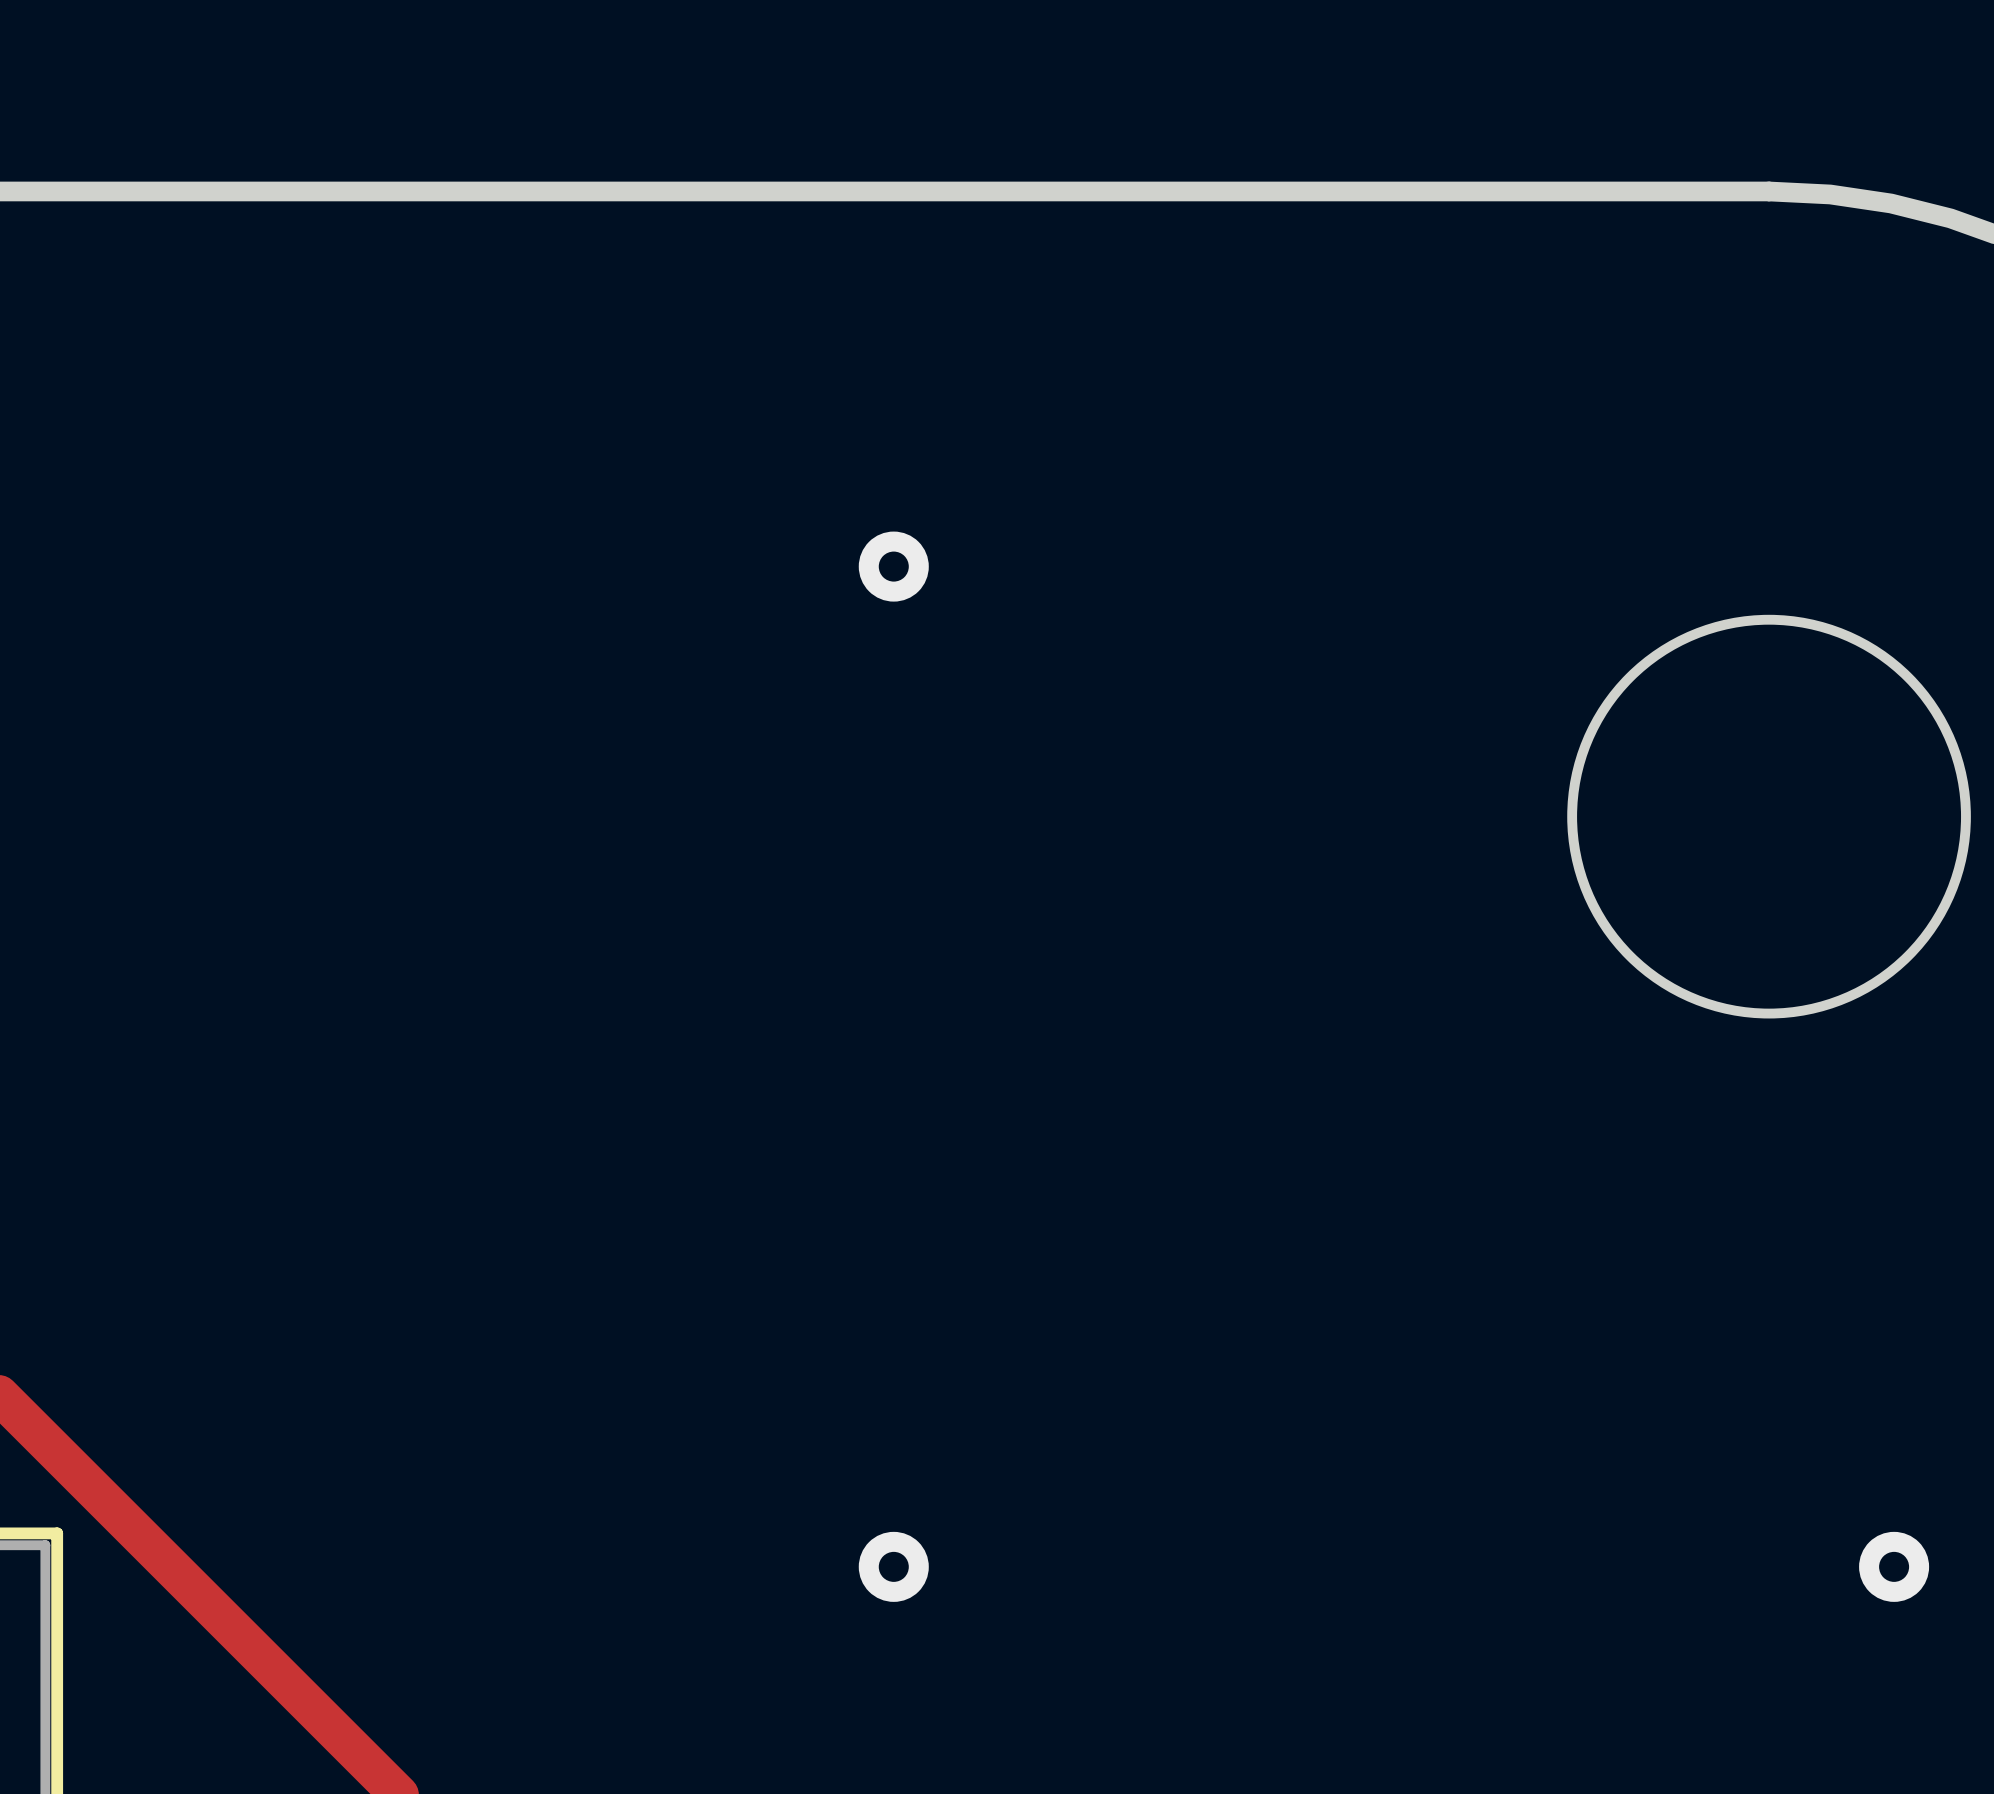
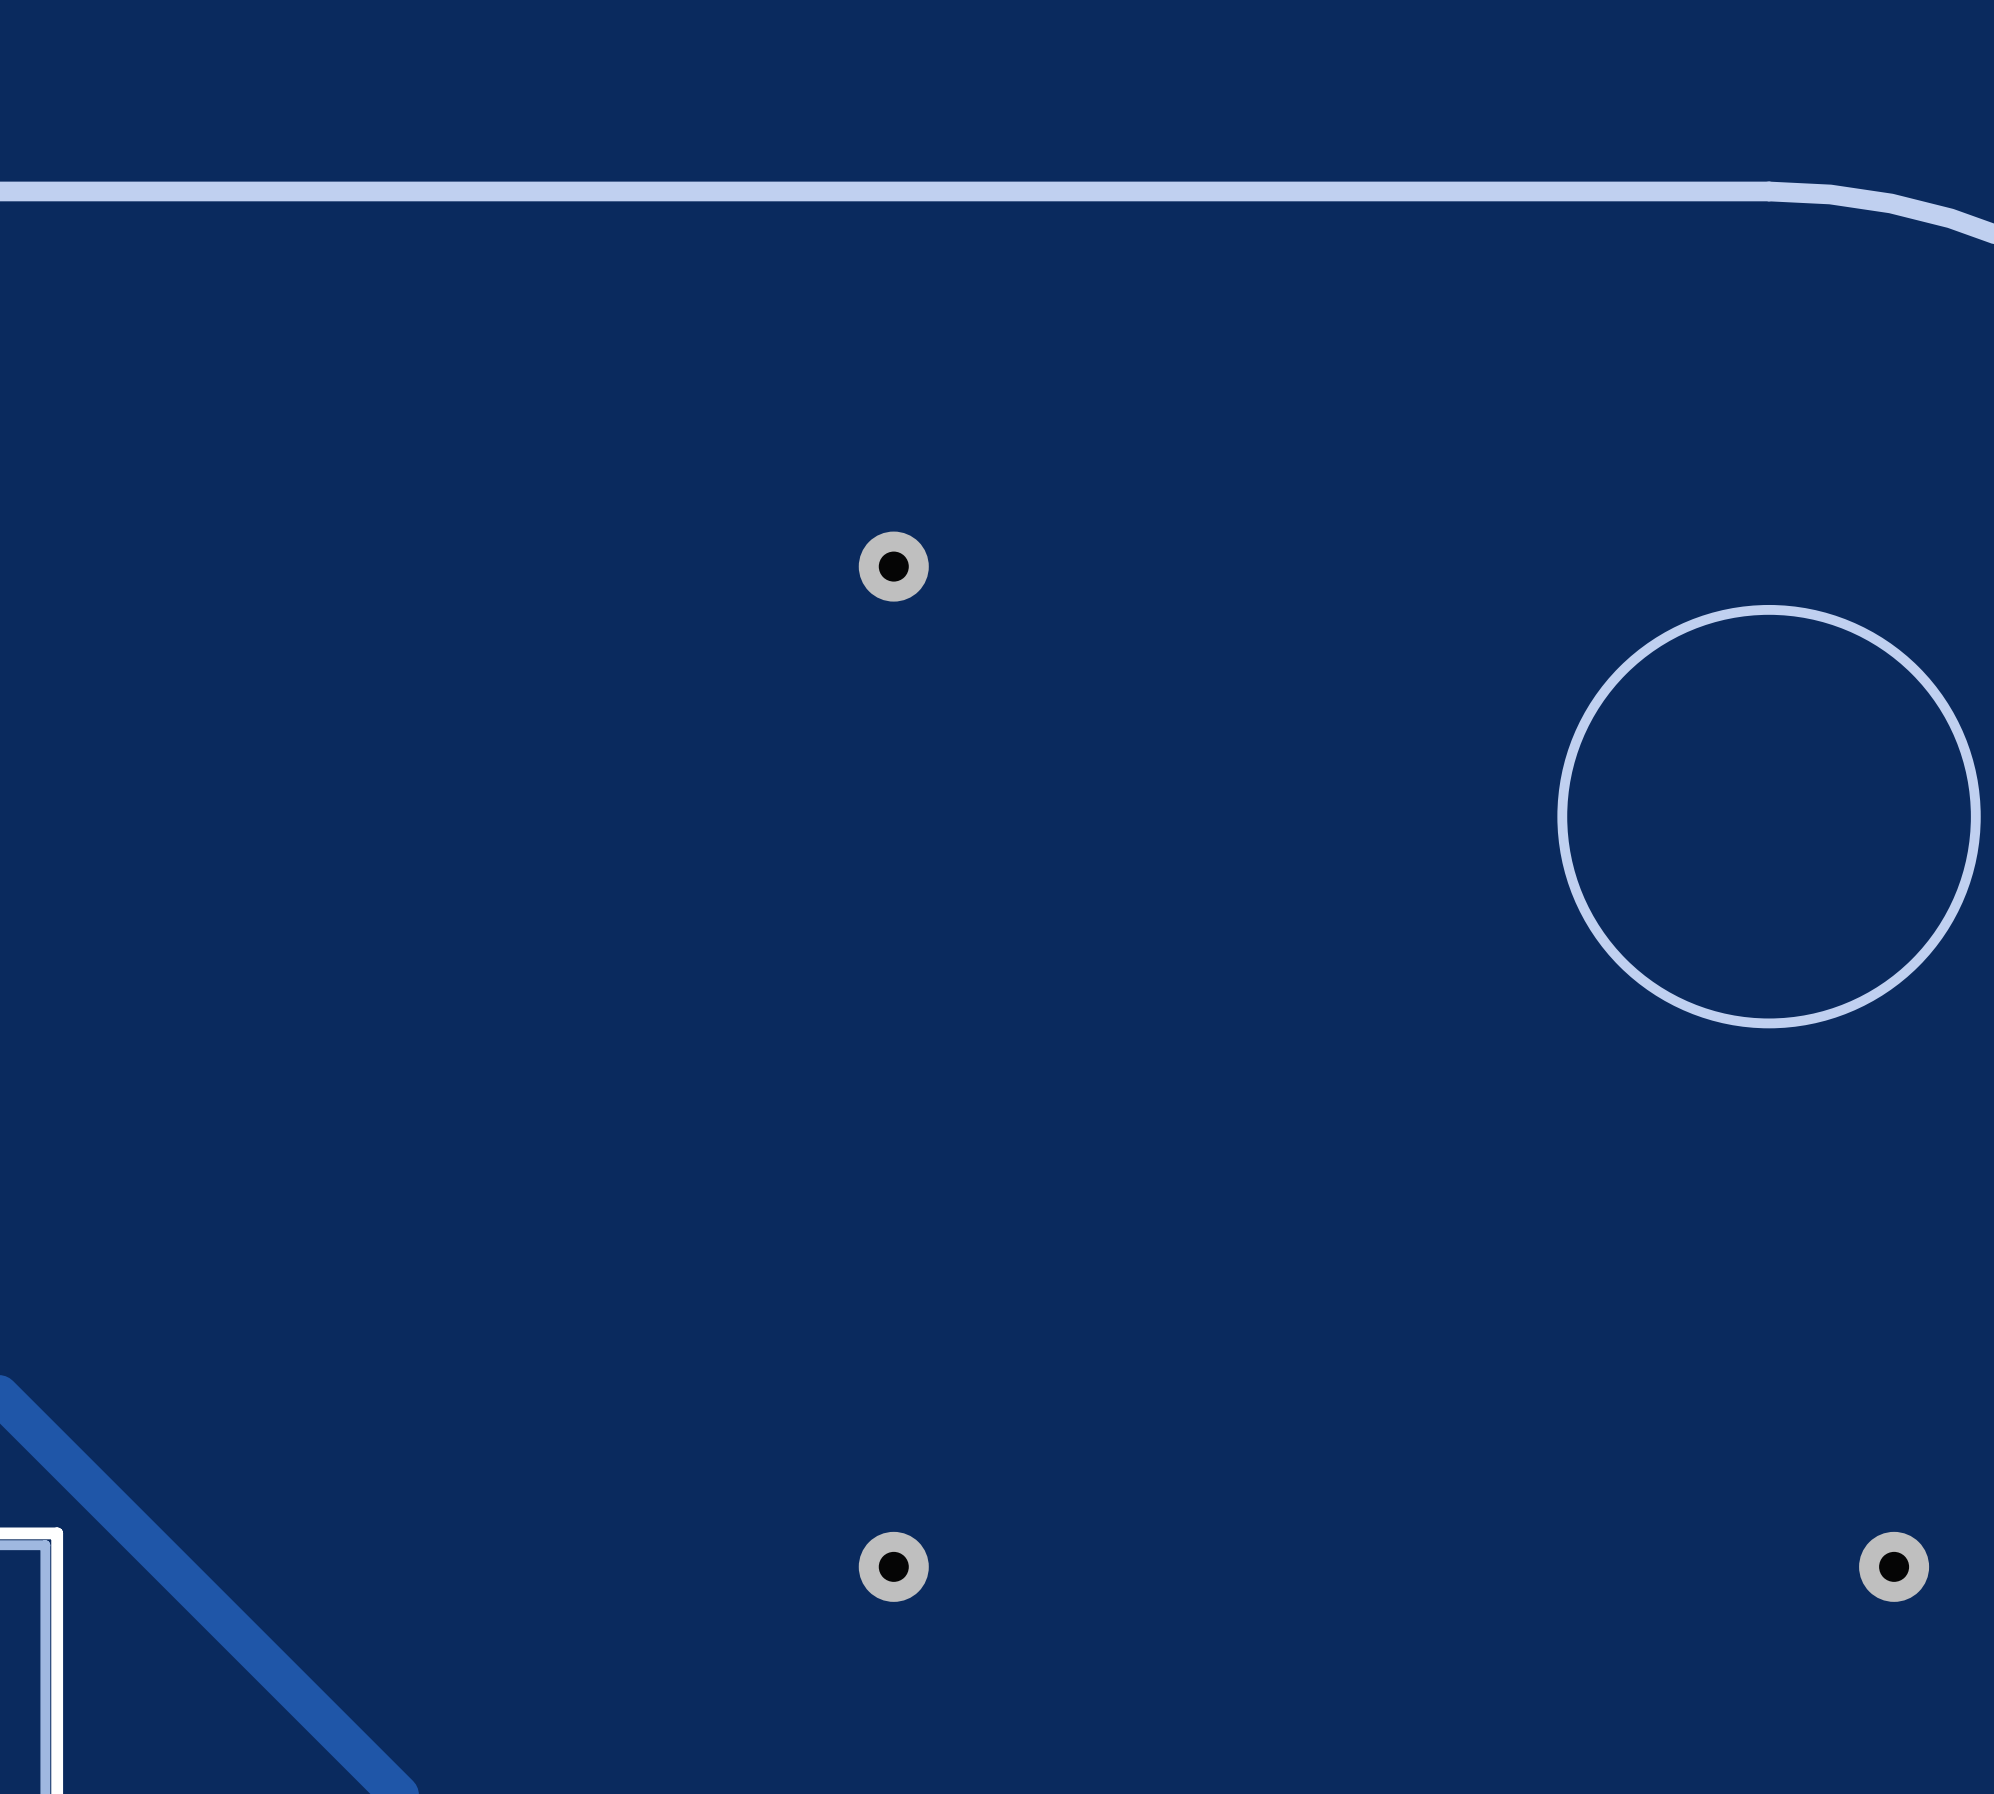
round board edge size: [1567, 614, 1971, 1019] -> [1557, 604, 1981, 1029]

